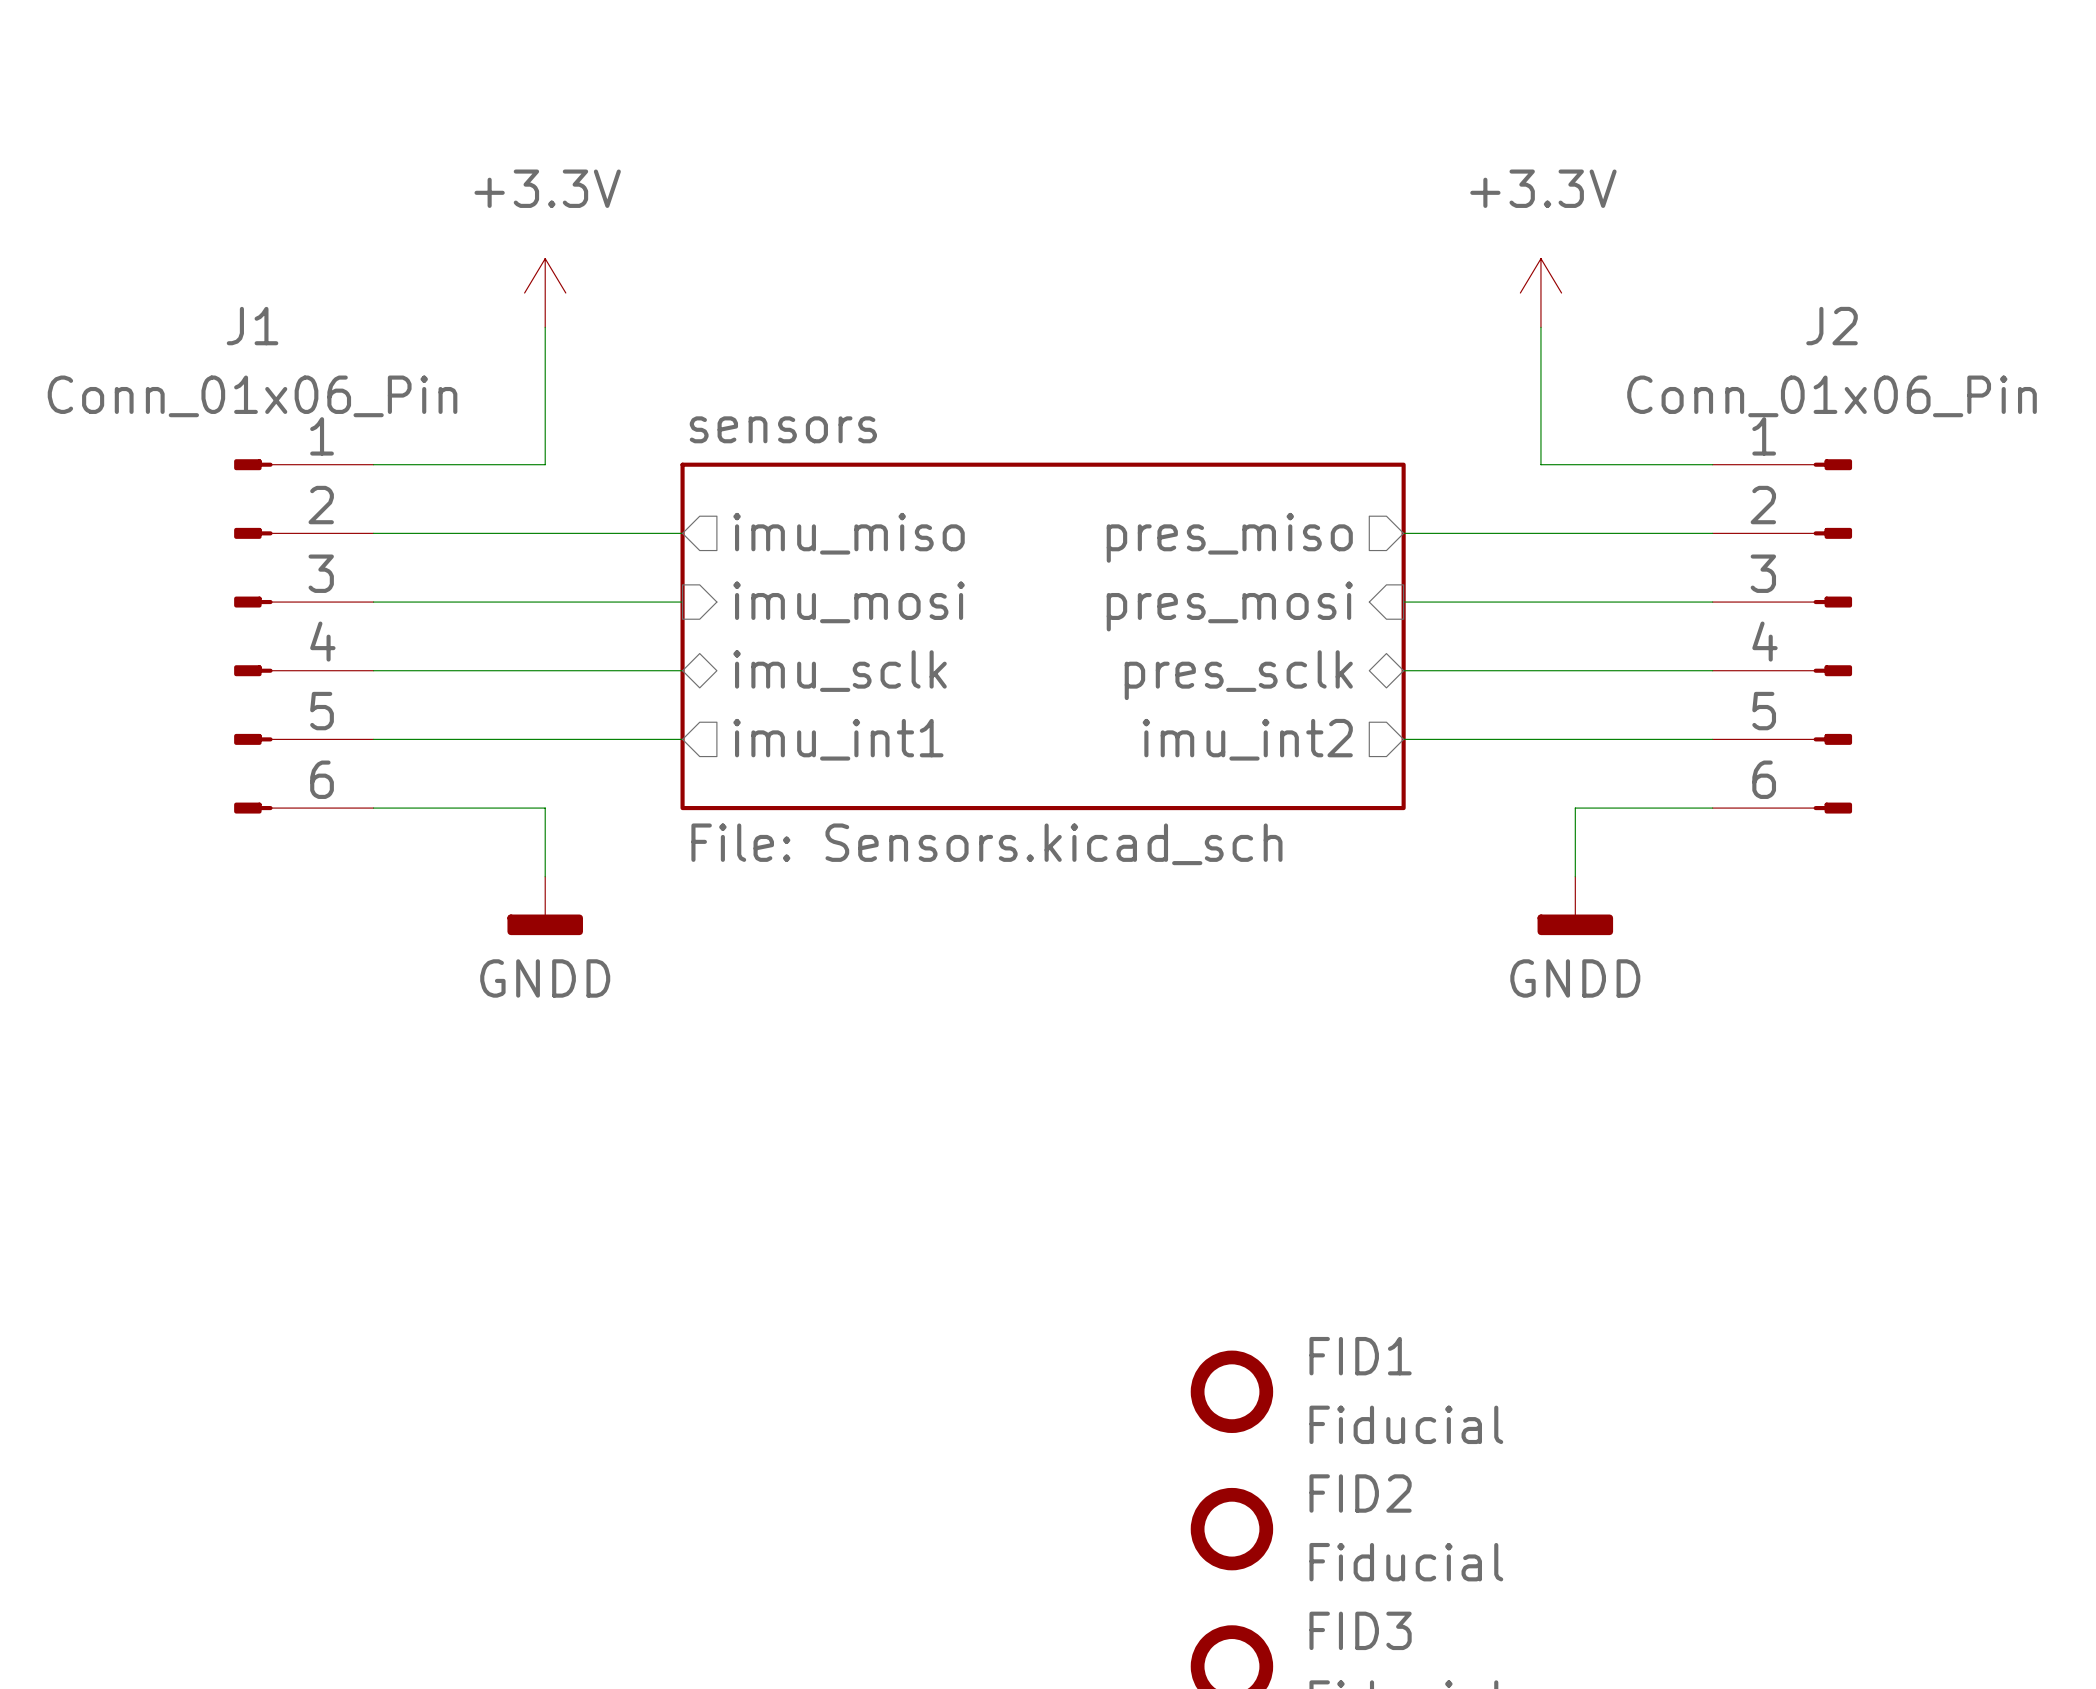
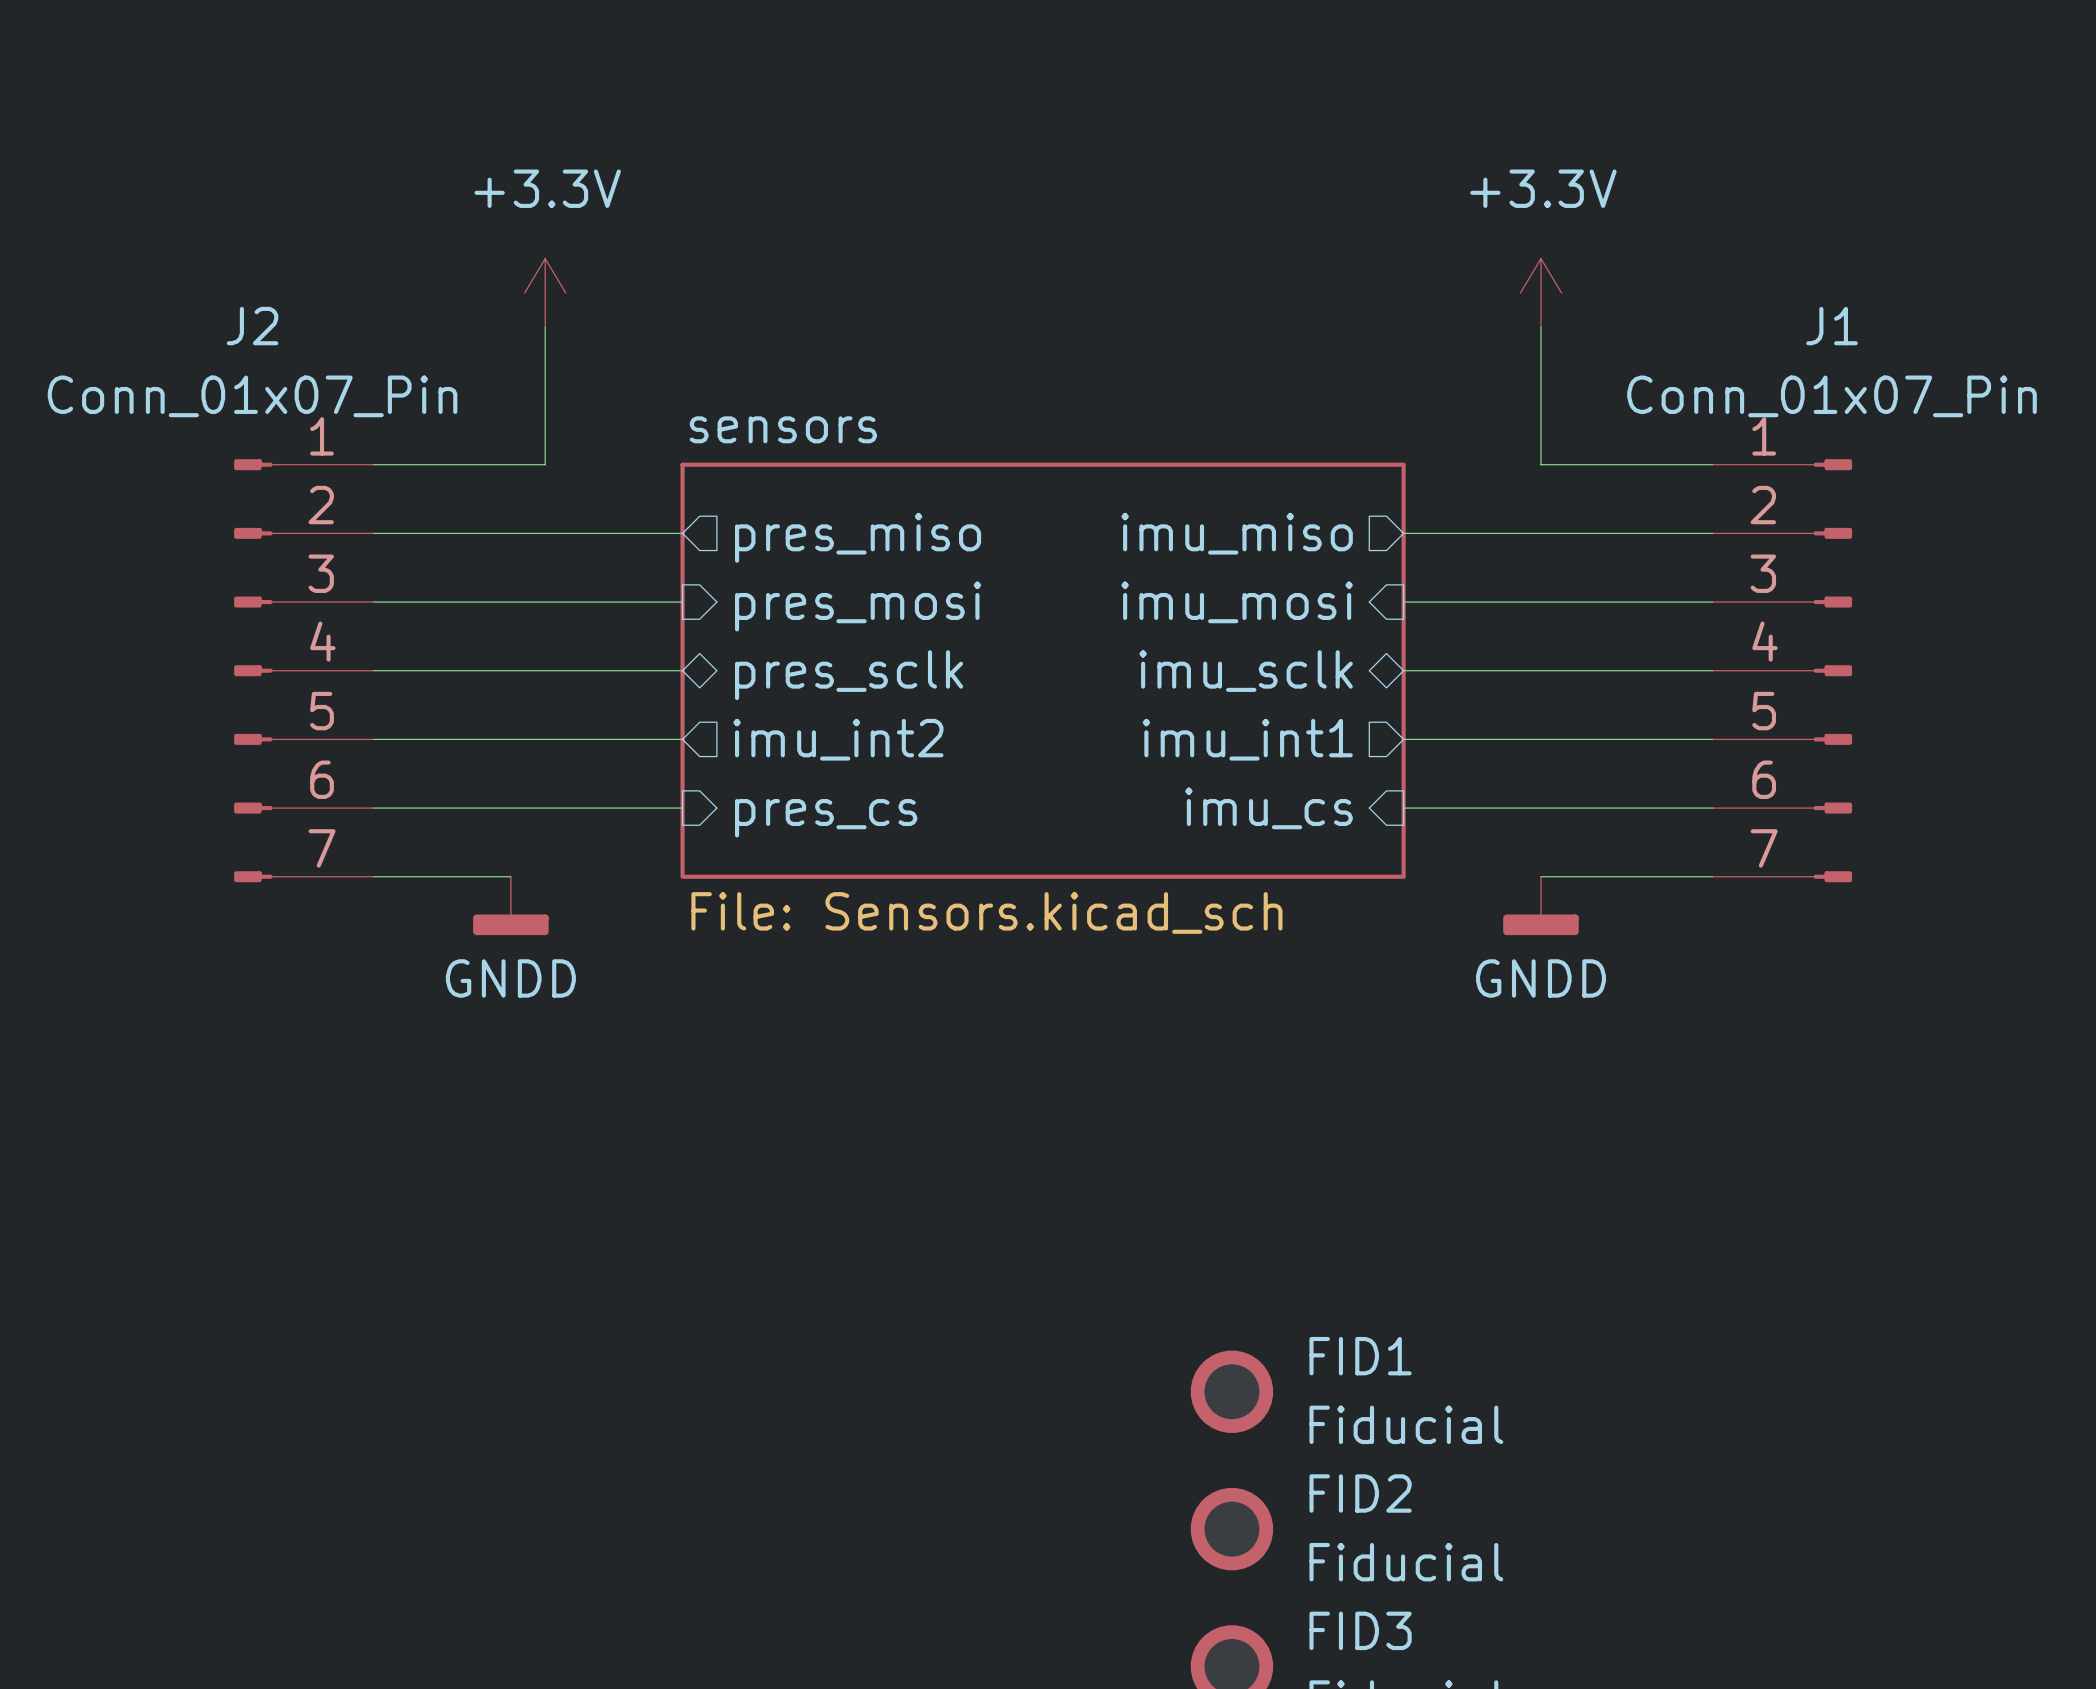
J1 name position: J1 (252, 326) -> J1 (1832, 326)
J2 name position: J2 (1832, 326) -> J2 (252, 326)
J1 value: Conn_01x06_Pin (252, 396) -> Conn_01x07_Pin (1832, 396)
J2 value: Conn_01x06_Pin (1832, 396) -> Conn_01x07_Pin (252, 396)
J1 symbol: [234, 459, 374, 814] -> [1712, 459, 1853, 883]
J2 symbol: [1712, 459, 1853, 814] -> [234, 459, 374, 883]
sheet pin: imu_miso (849, 533) -> pres_miso (858, 537)
sheet pin: pres_miso (1229, 537) -> imu_miso (1237, 533)
sheet pin: imu_mosi (849, 602) -> pres_mosi (858, 606)
sheet pin: pres_mosi (1229, 606) -> imu_mosi (1237, 602)
sheet sensors: File: Sensors.kicad_sch (1043, 636) -> none
sheet sensors: none -> File: Sensors.kicad_sch (1043, 670)
sheet pin: imu_sclk (840, 671) -> pres_sclk (849, 675)
sheet pin: pres_sclk (1238, 675) -> imu_sclk (1246, 671)
sheet pin: imu_int1 (838, 739) -> imu_int2 (838, 739)
sheet pin: imu_int2 (1247, 739) -> imu_int1 (1247, 739)
wire: (545, 808) (545, 876) -> (545, 808) (682, 808)
sheet pin: none -> imu_cs (1269, 808)
wire: (1575, 808) (1575, 876) -> (1575, 808) (1403, 808)
sheet pin: none -> pres_cs (826, 818)
wire: none -> (373, 876) (510, 876)
wire: none -> (1540, 876) (1712, 876)
power symbol position: GNDD (545, 905) -> GNDD (510, 905)
power symbol position: GNDD (1575, 905) -> GNDD (1540, 905)

